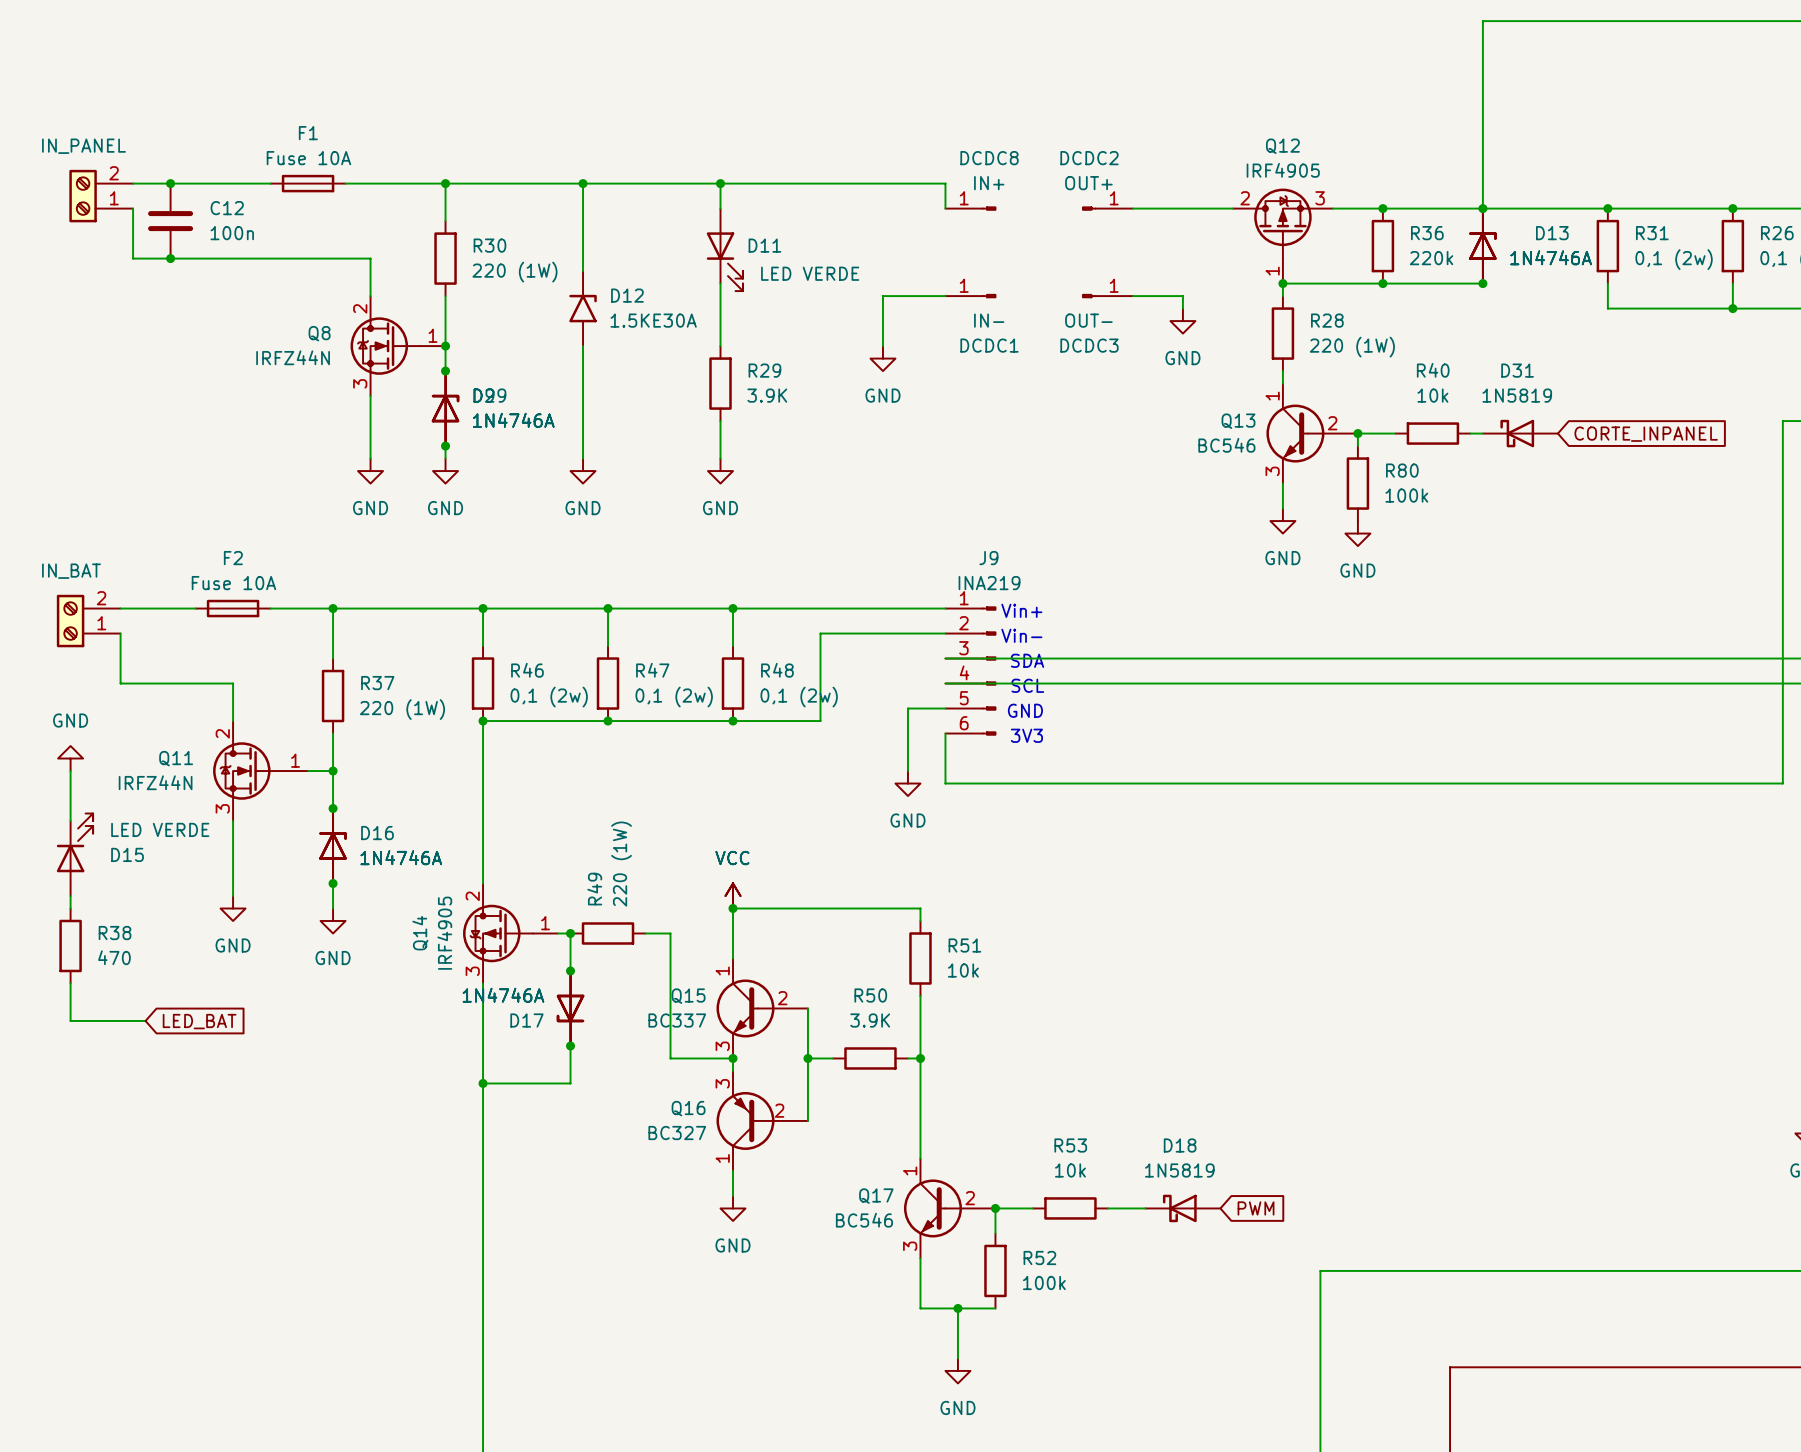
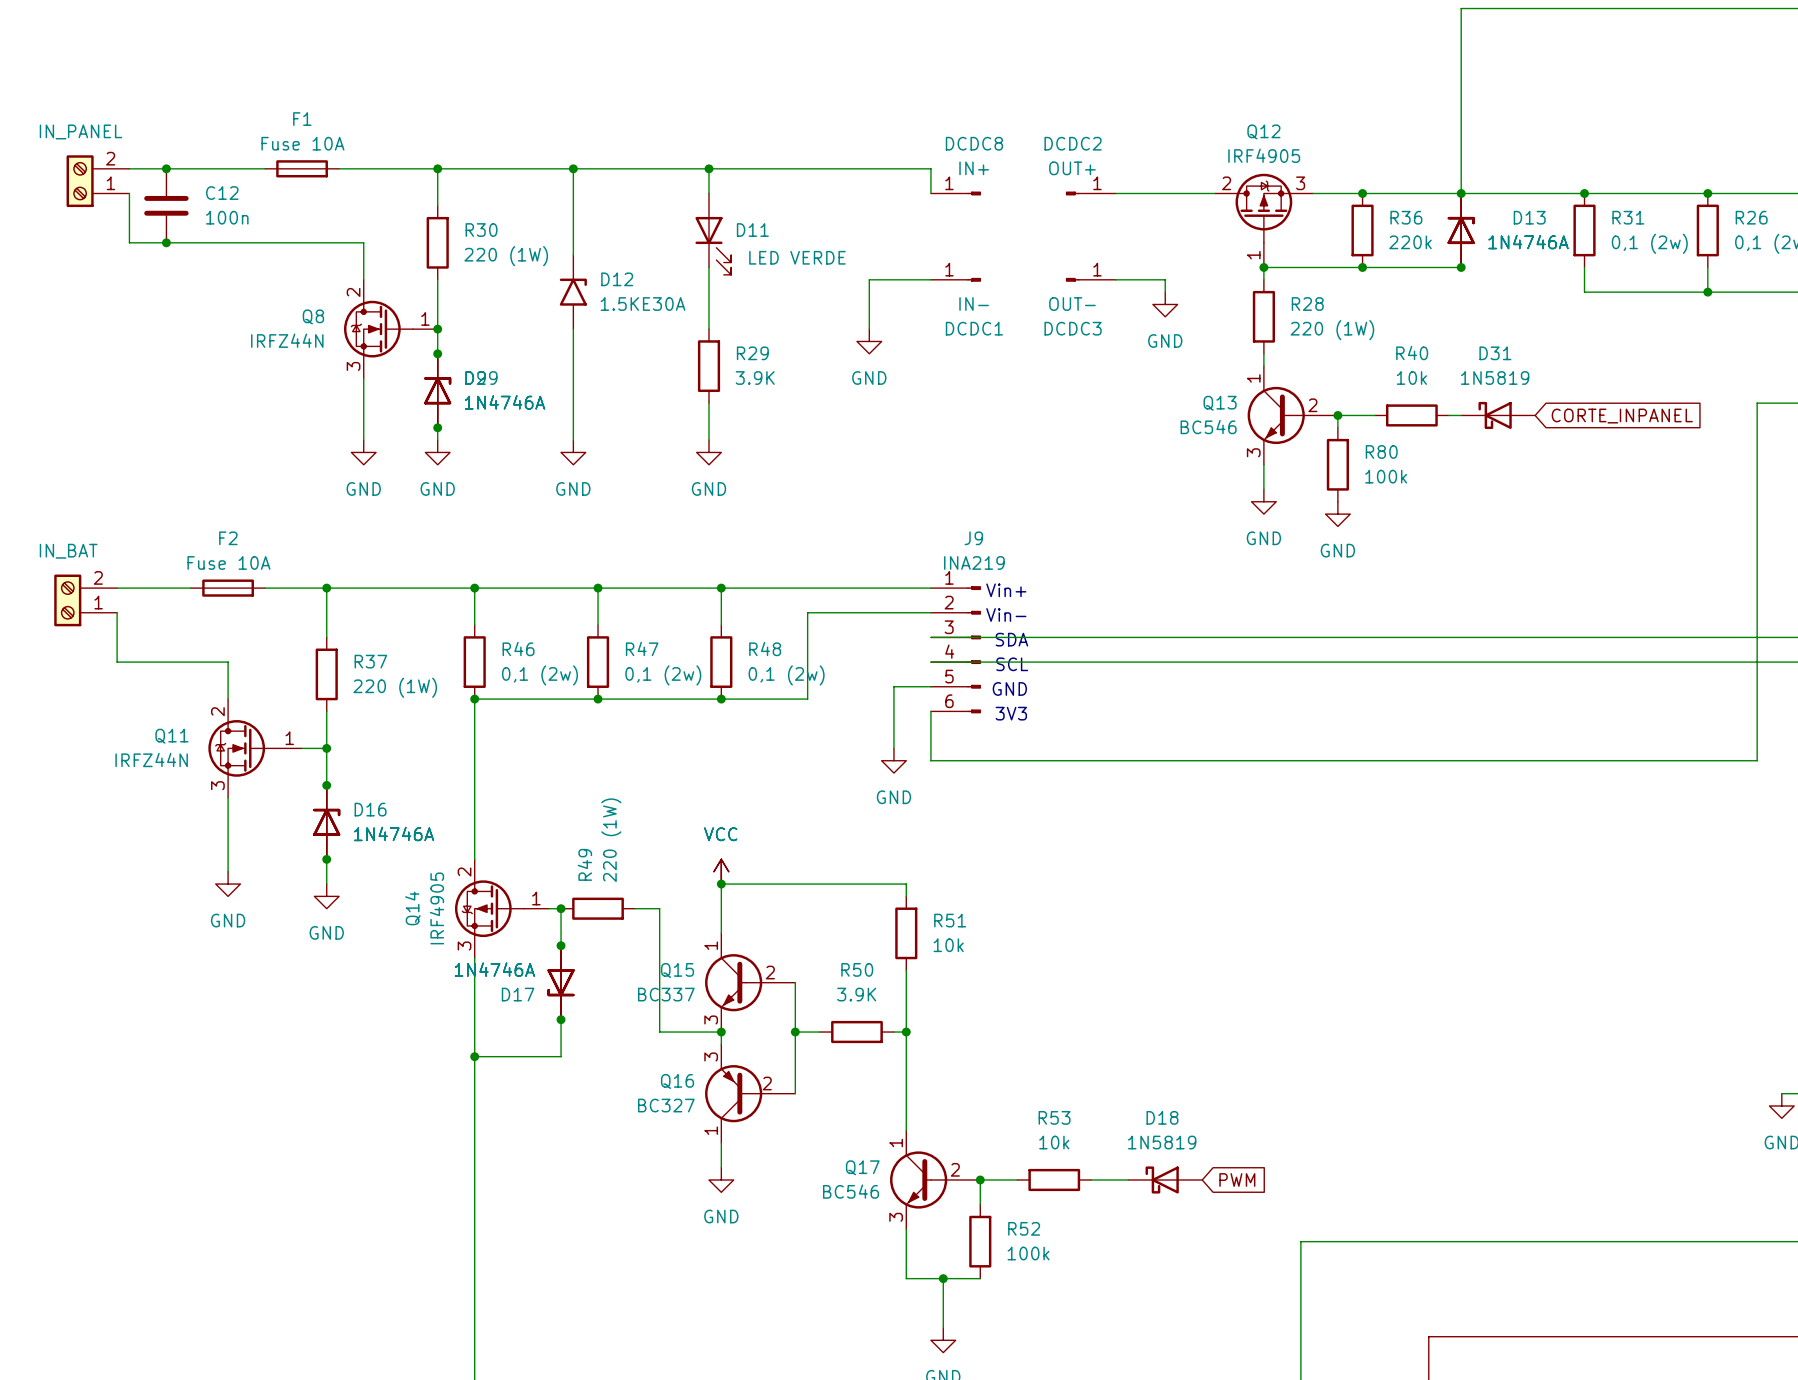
power symbol: GND (70, 758) -> none
wire: (70, 771) (70, 821) -> none
D15: LED VERDE (74, 854) -> none
wire: (70, 896) (70, 908) -> none
R38: 470 (70, 945) -> none
wire: (70, 983) (70, 1020) (145, 1020) -> none
global label: LED_BAT (199, 1021) -> none

